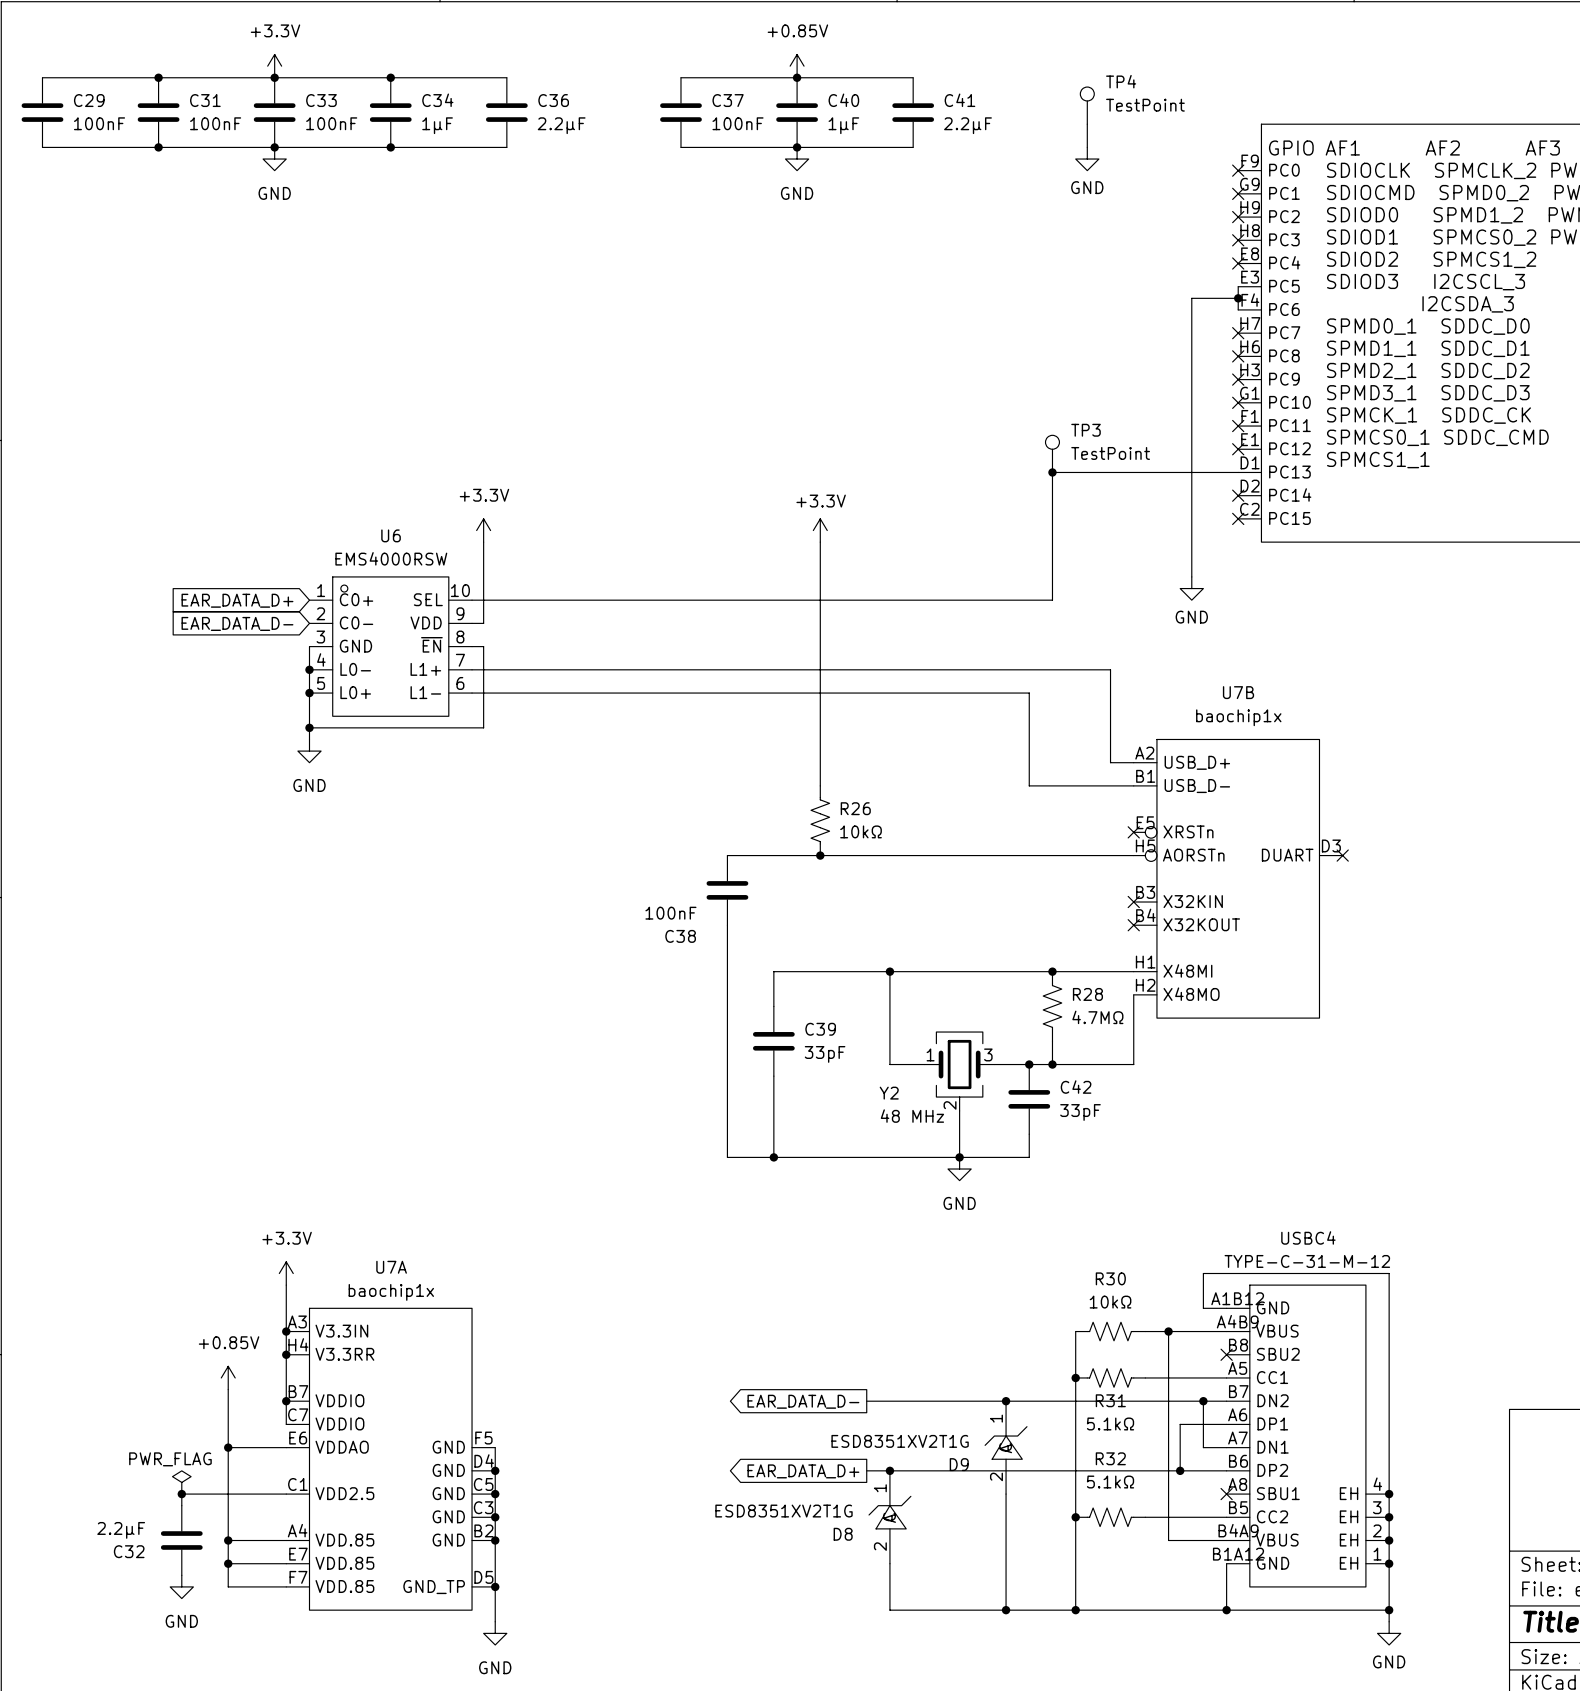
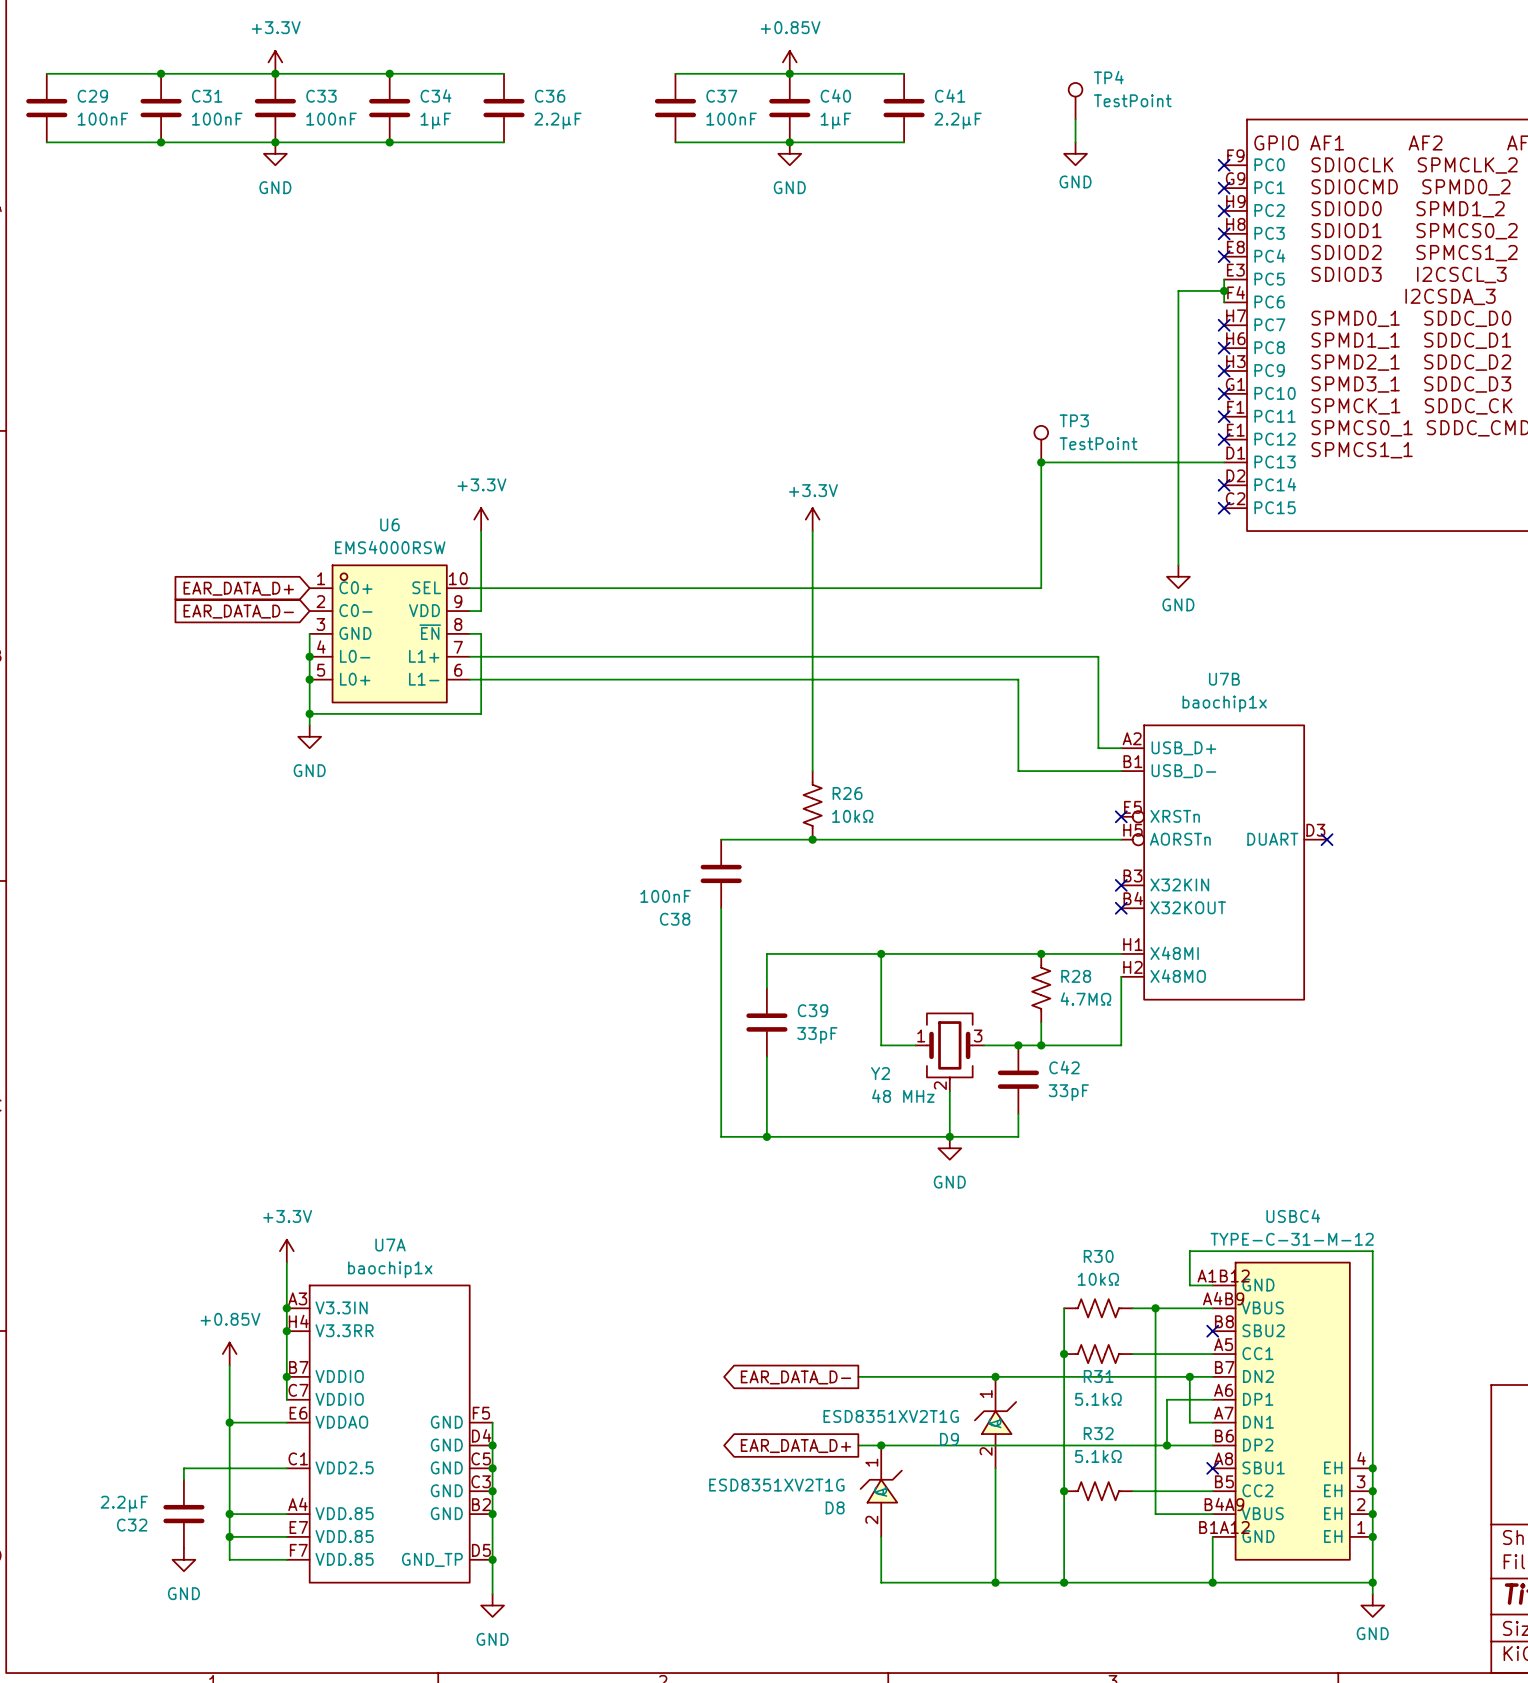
power symbol: PWR_FLAG (181, 1482) -> none
junction: (181, 1494) -> none

